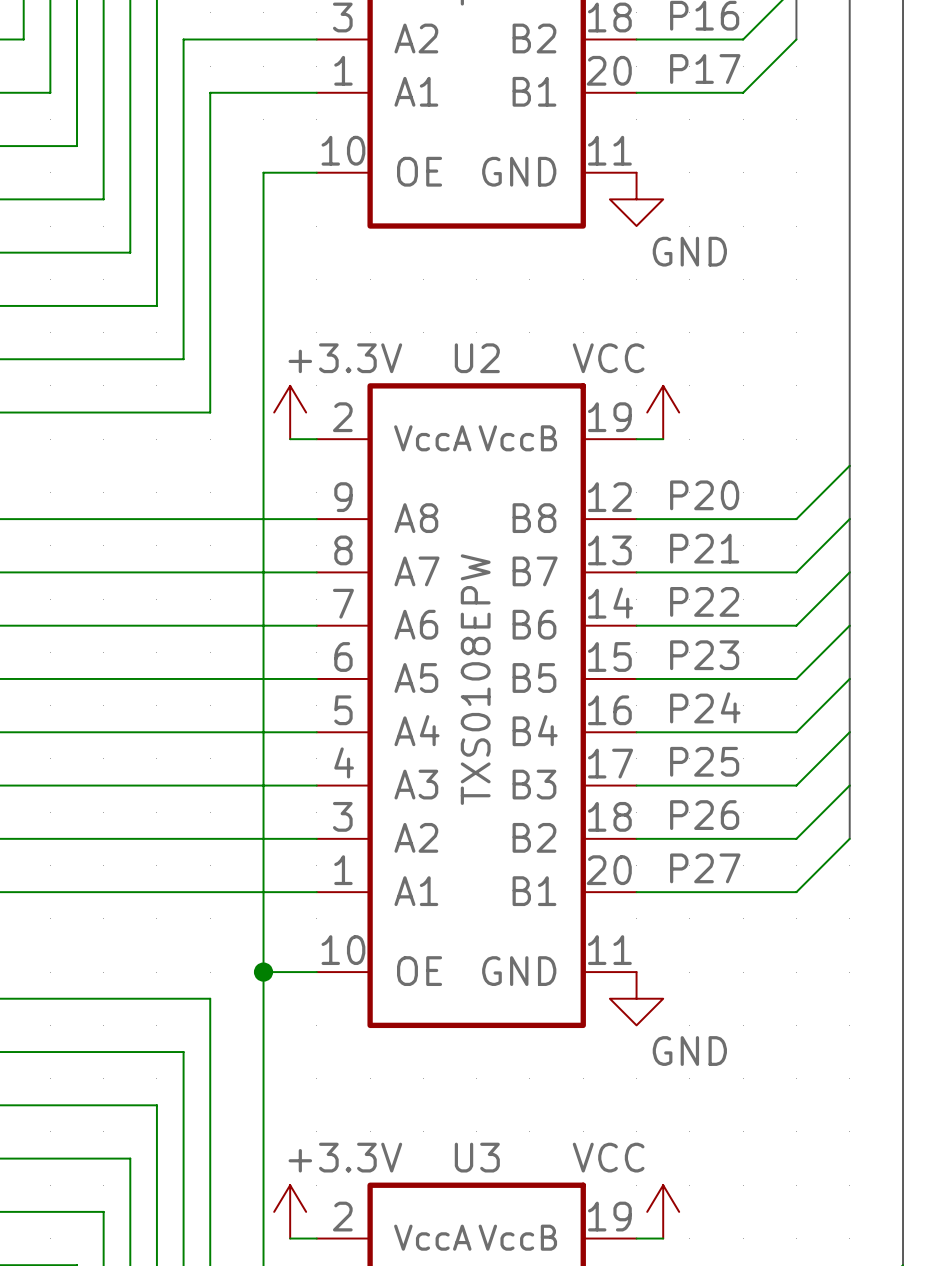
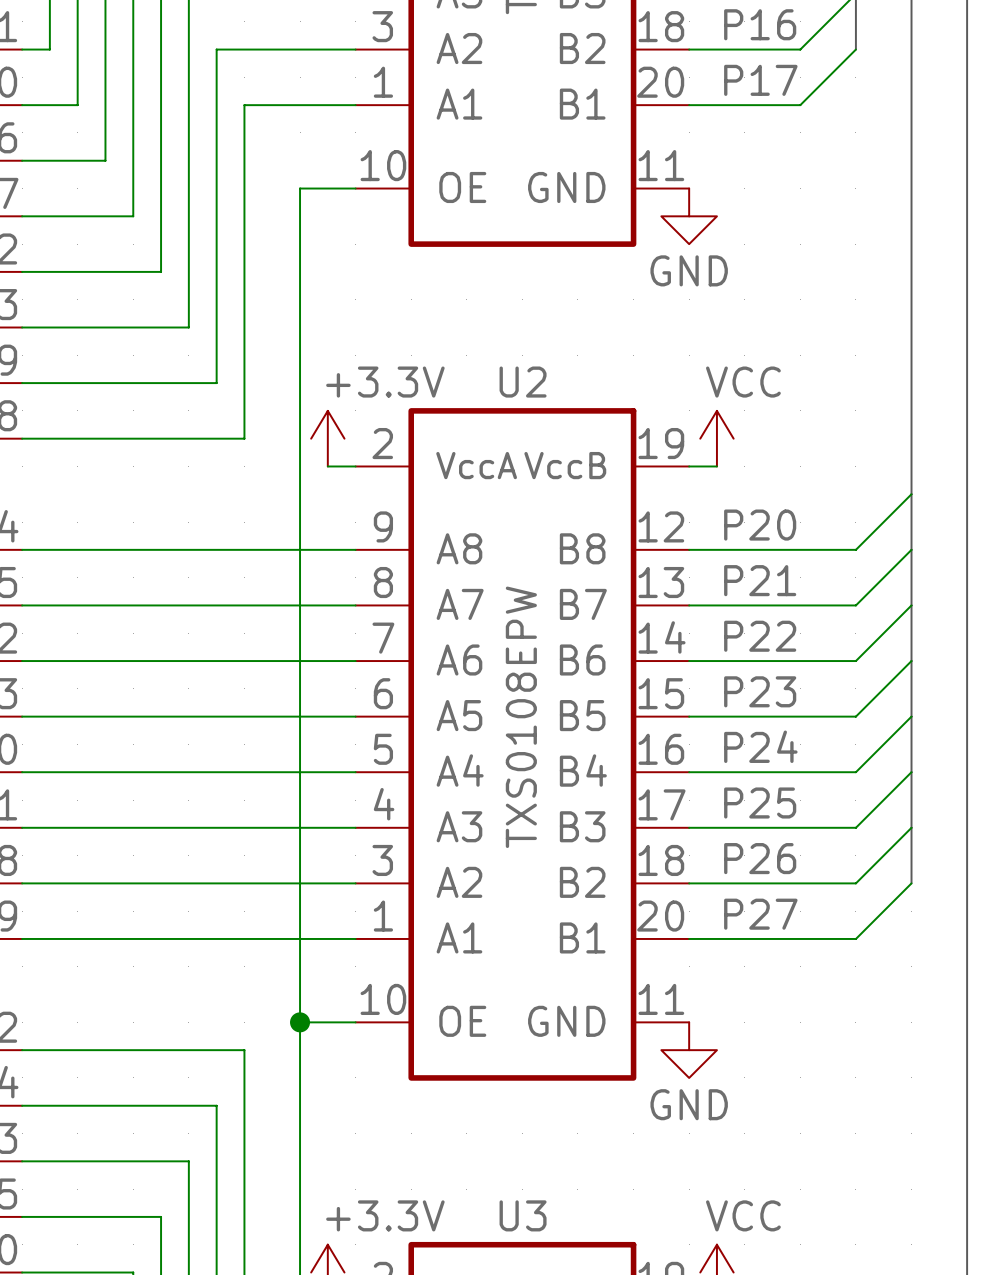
power symbol text position: GND (689, 251) -> GND (689, 270)
power symbol text position: VCC (608, 358) -> VCC (743, 382)
power symbol text position: GND (689, 1051) -> GND (689, 1104)
power symbol text position: VCC (608, 1157) -> VCC (743, 1215)

